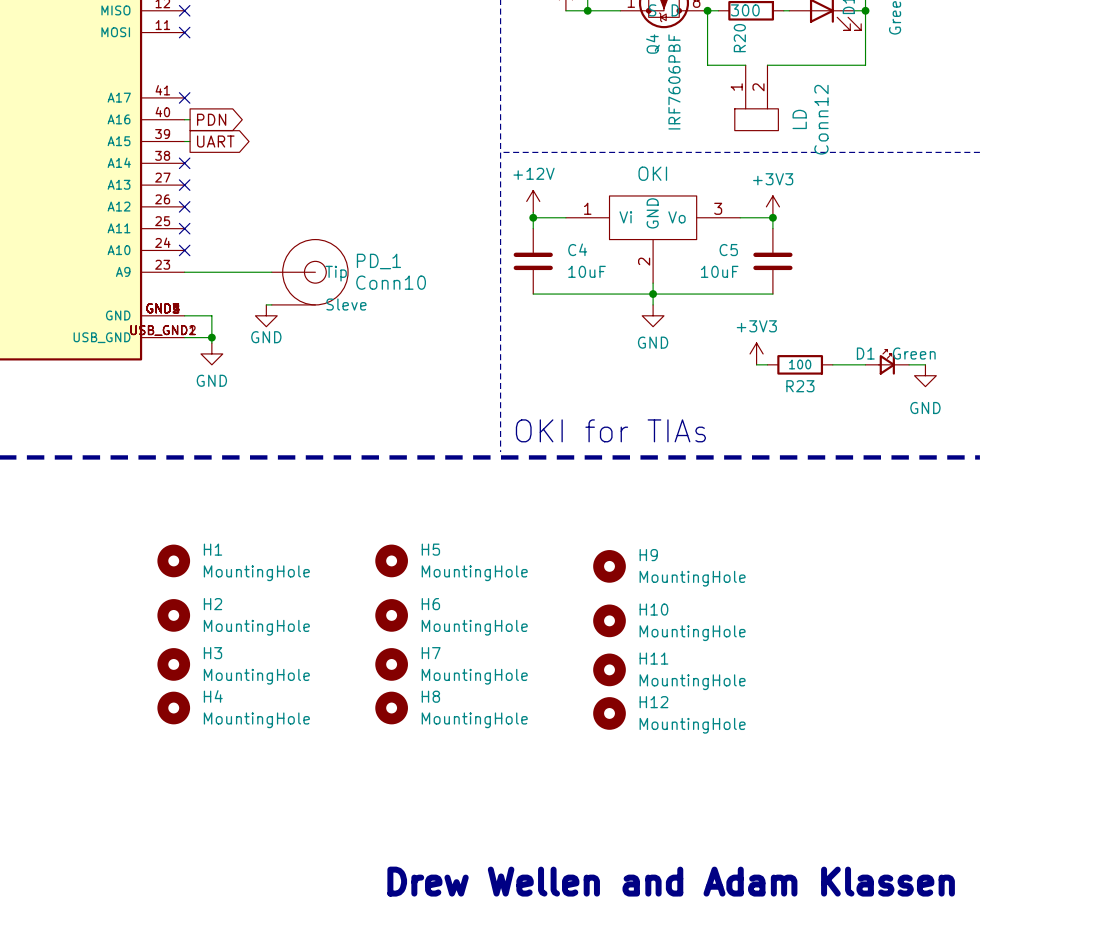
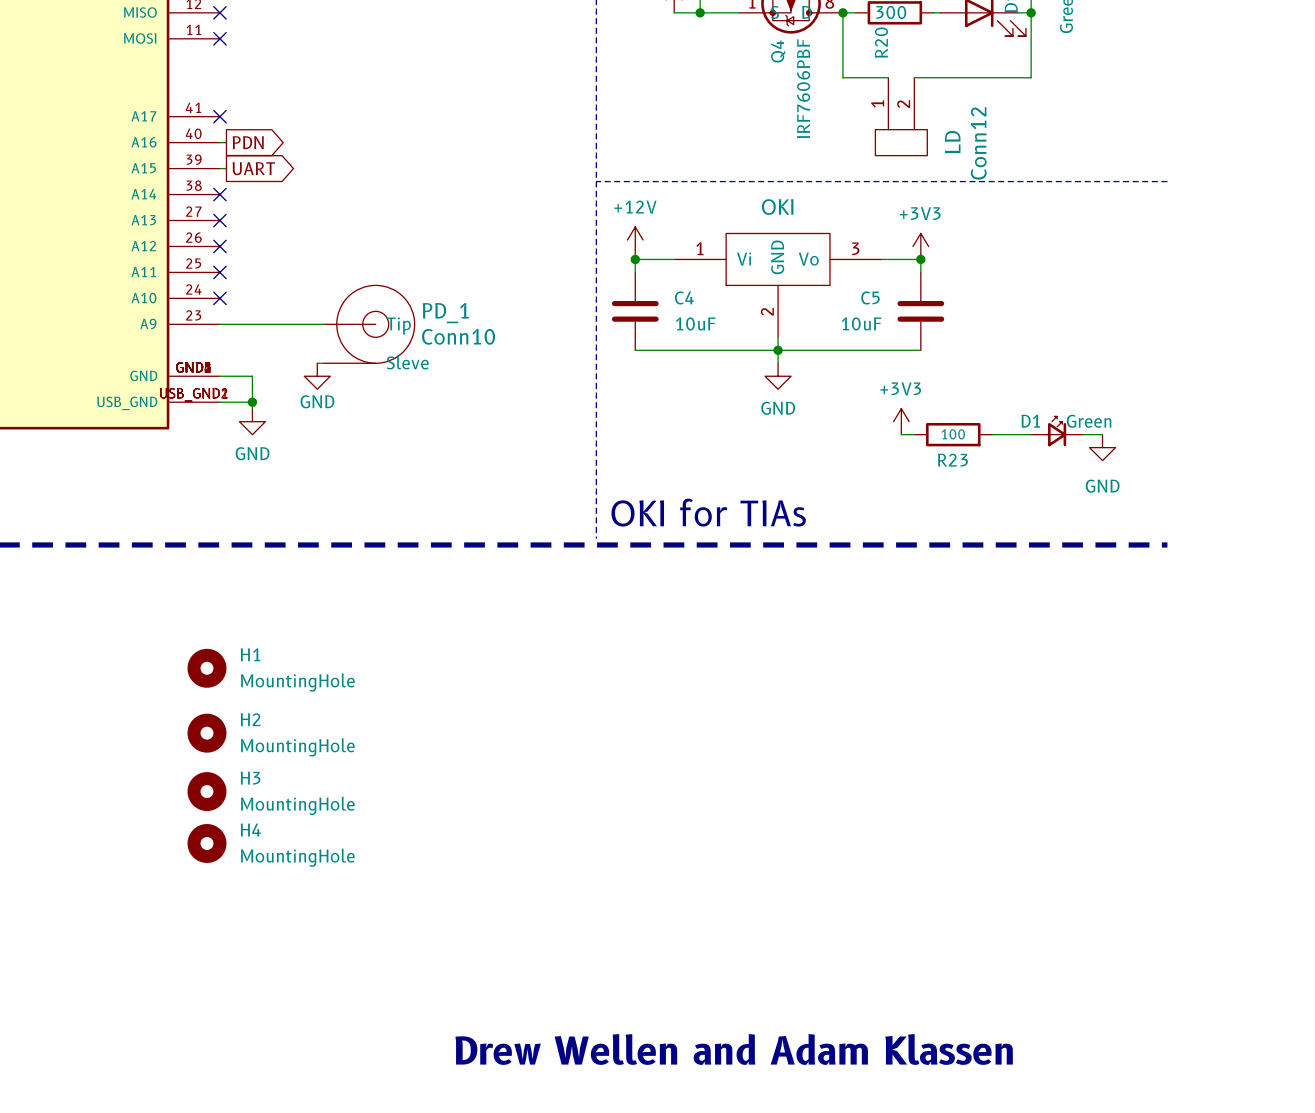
H5: MountingHole (391, 560) -> none
H9: MountingHole (609, 566) -> none
H6: MountingHole (391, 615) -> none
H10: MountingHole (609, 620) -> none
H7: MountingHole (391, 664) -> none
H11: MountingHole (609, 669) -> none
H8: MountingHole (391, 708) -> none
H12: MountingHole (609, 713) -> none

